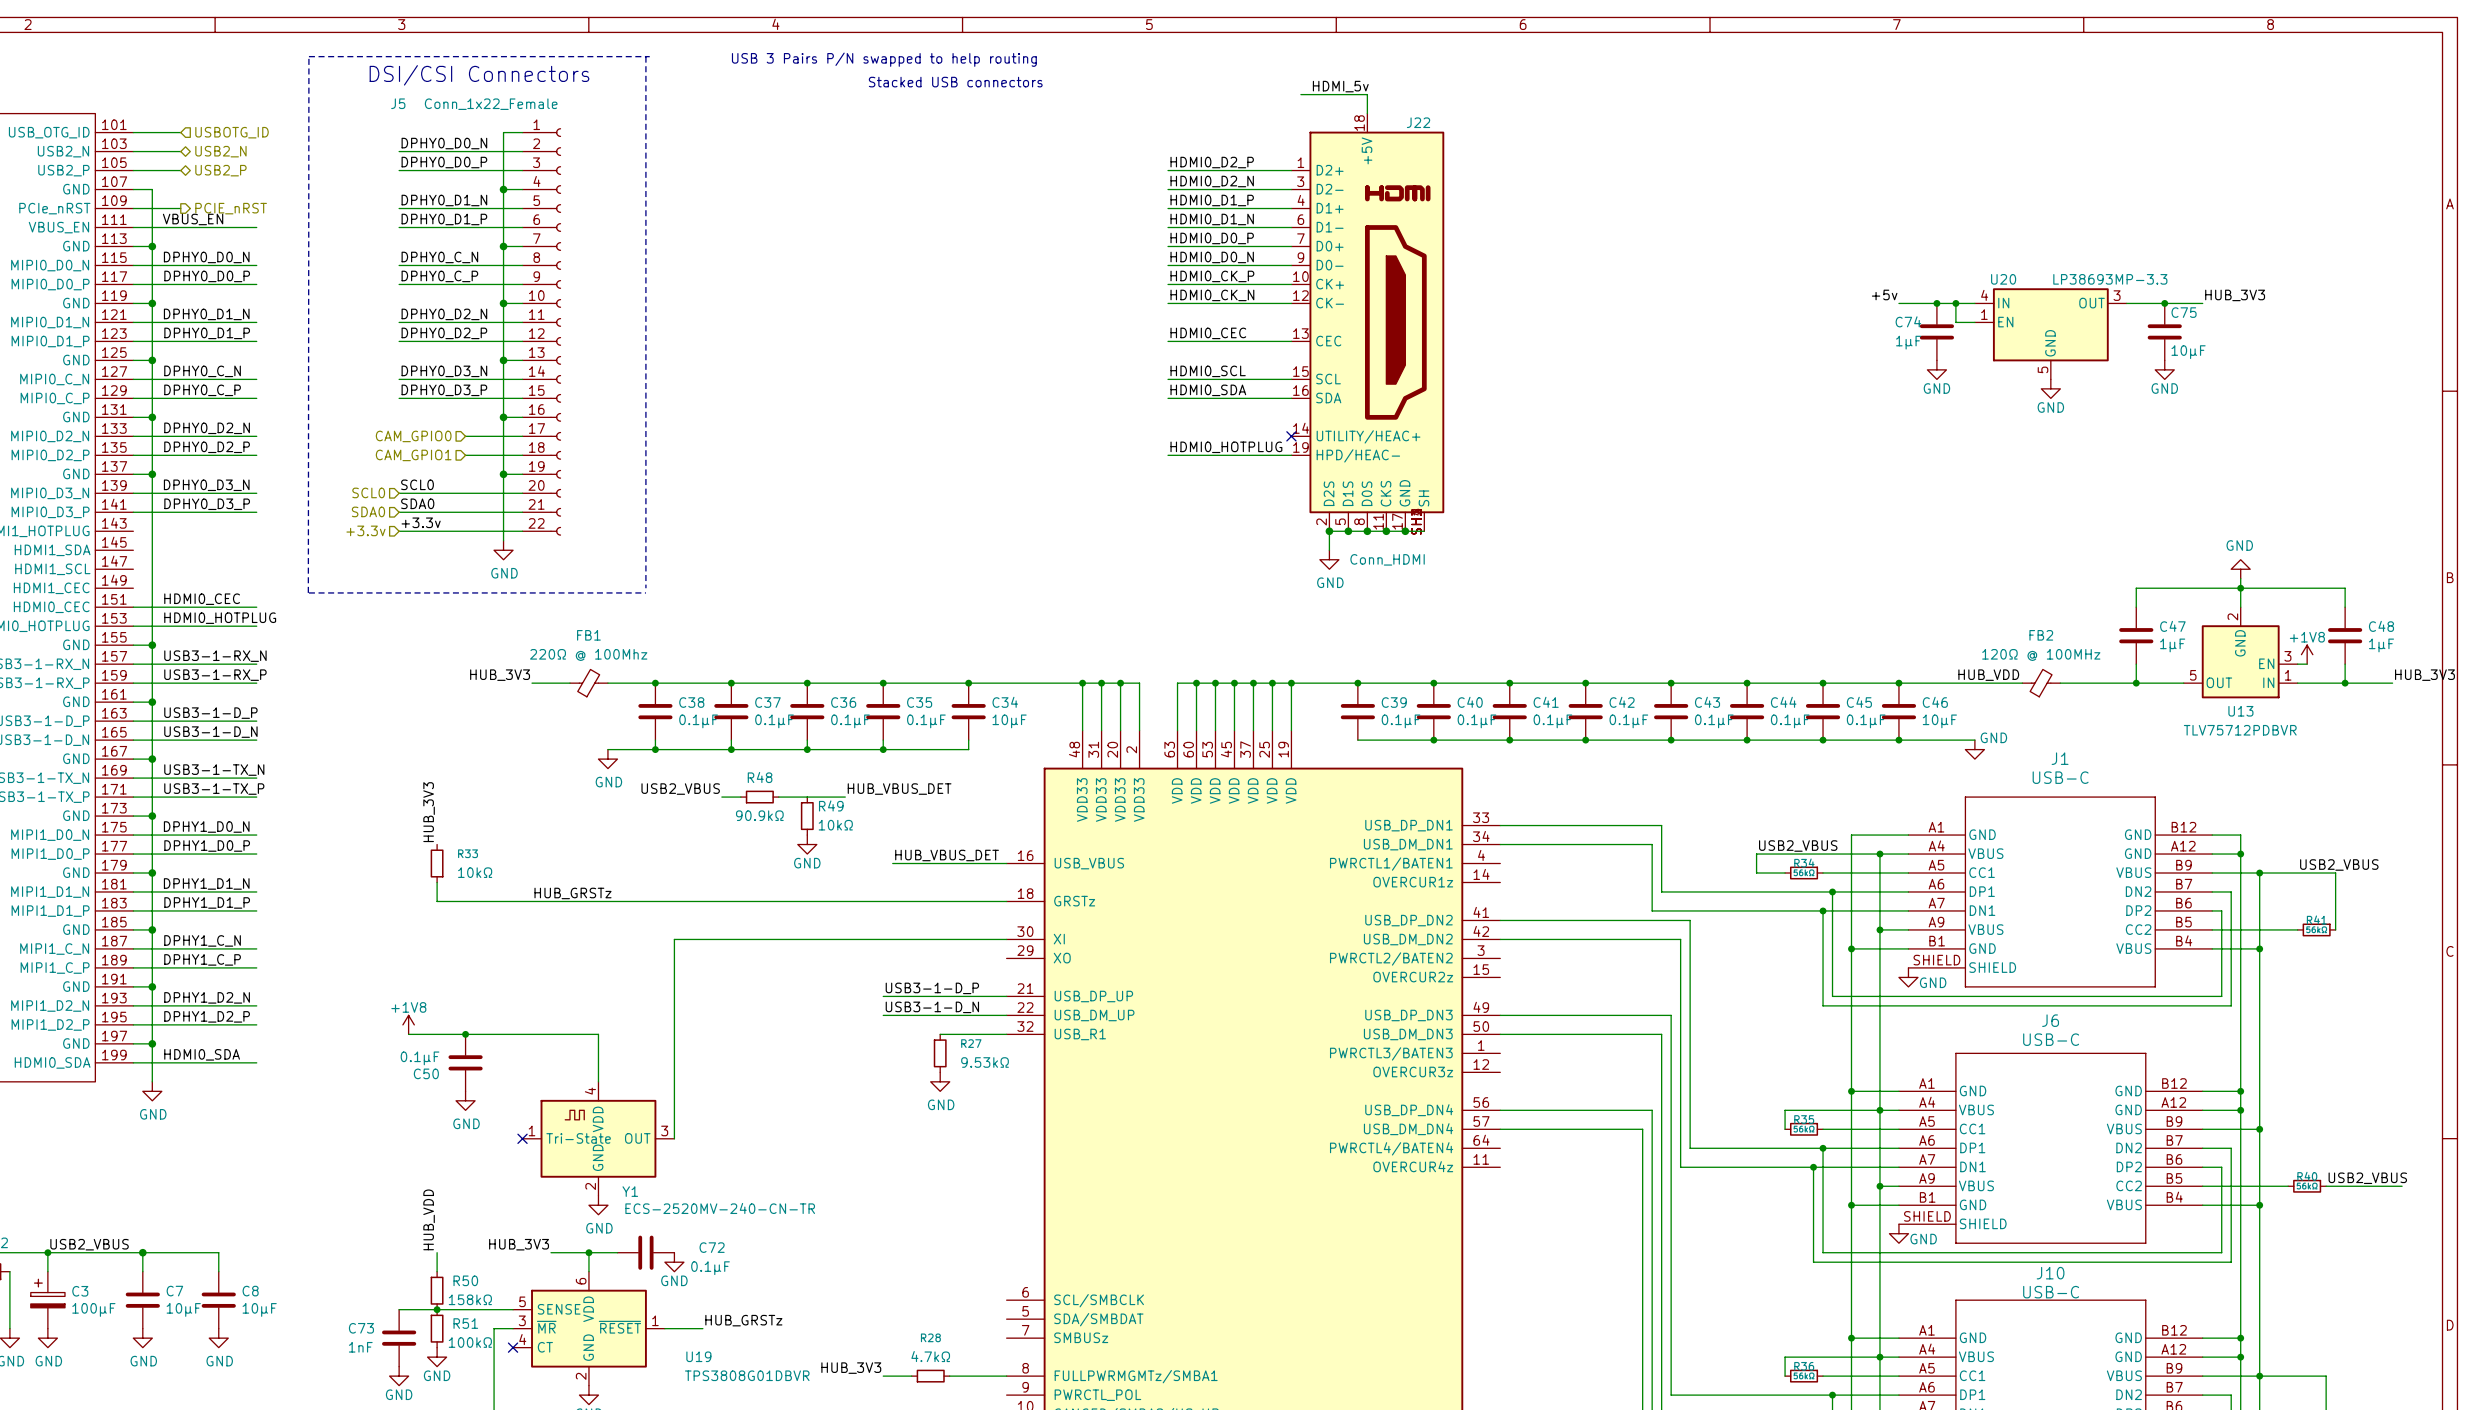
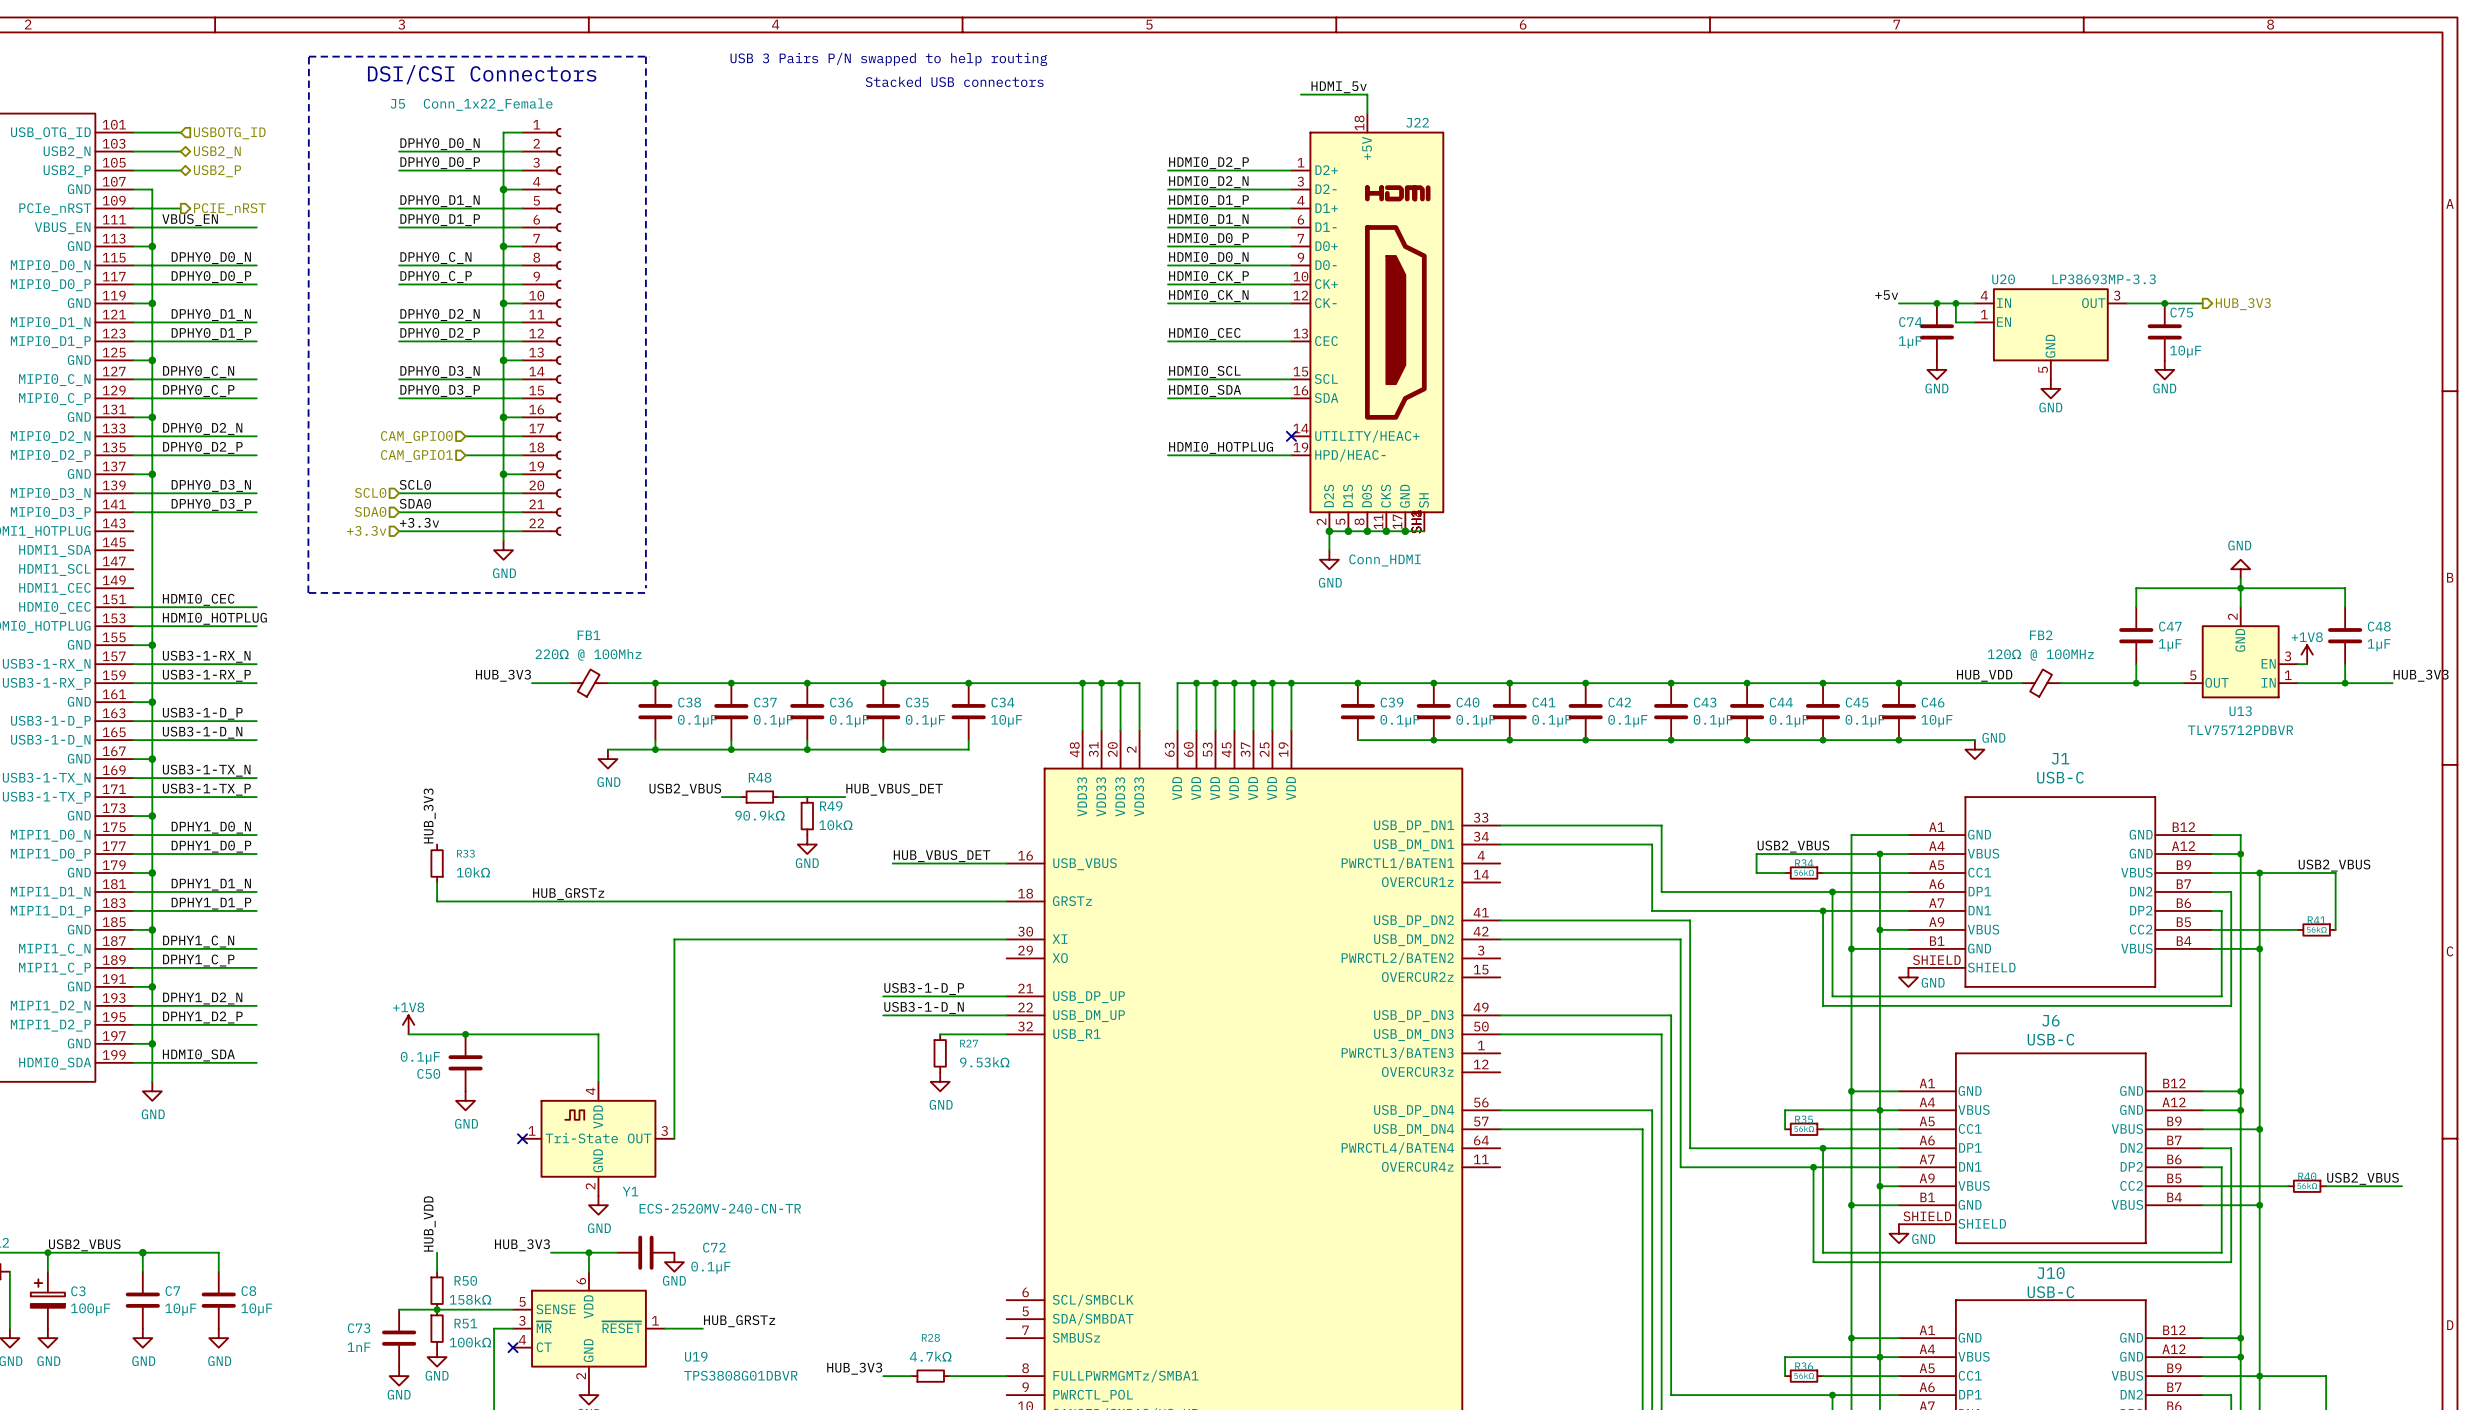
label: HUB_3V3 (2235, 295) -> none
hierarchical label: none -> HUB_3V3 (2243, 304)

